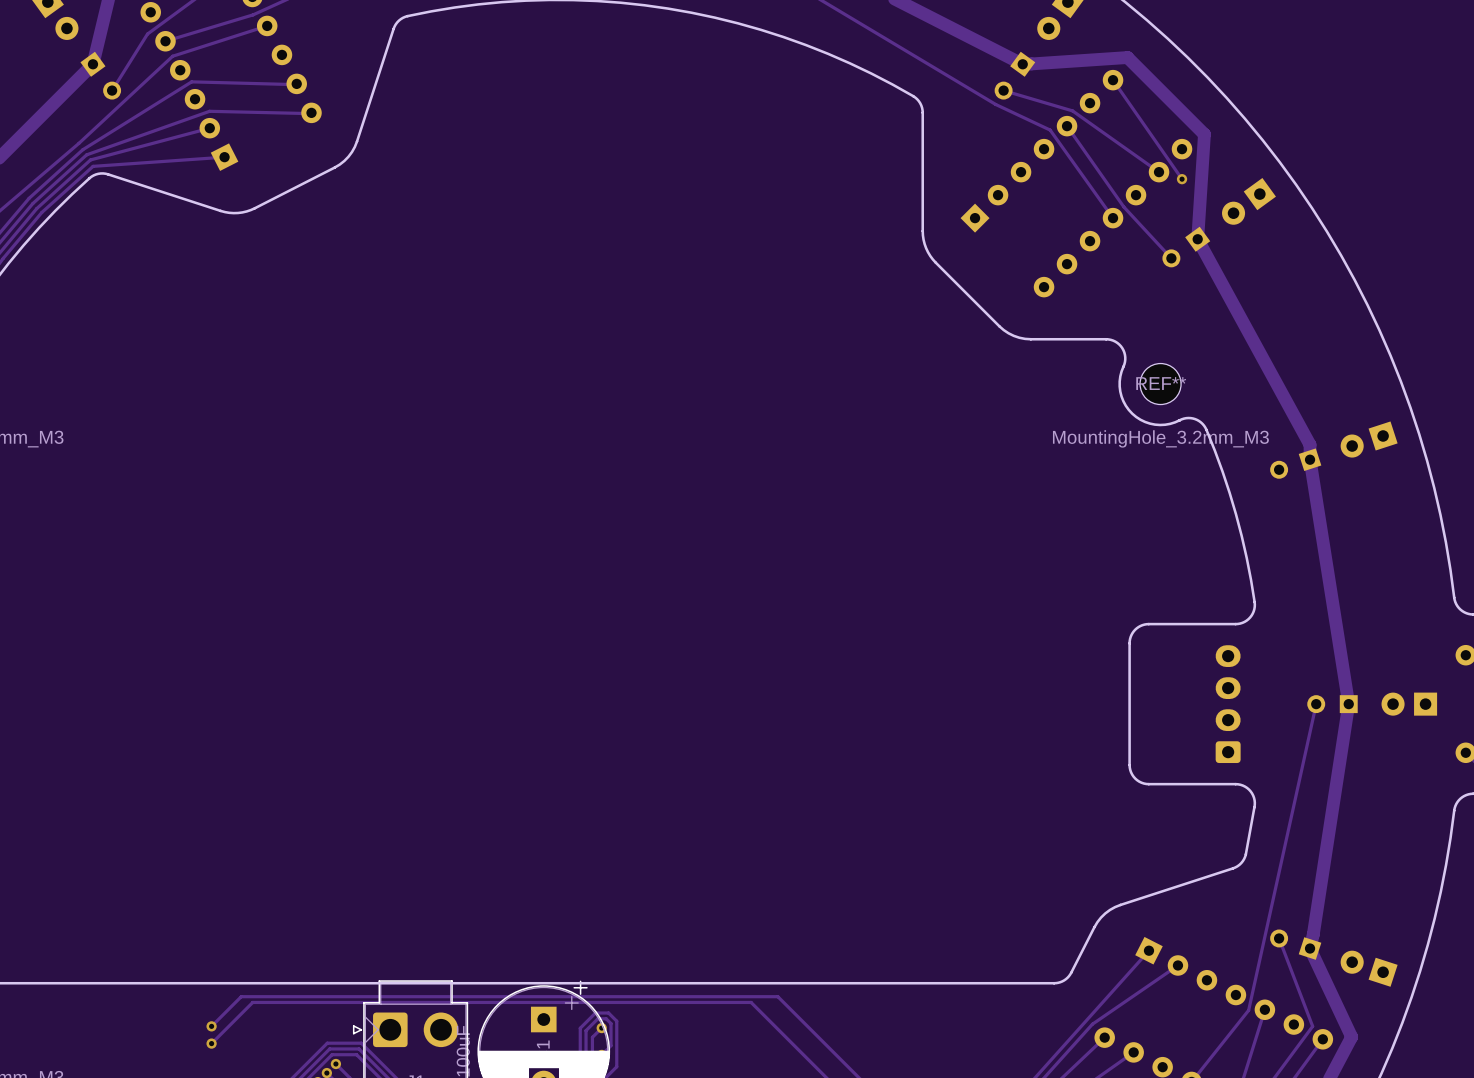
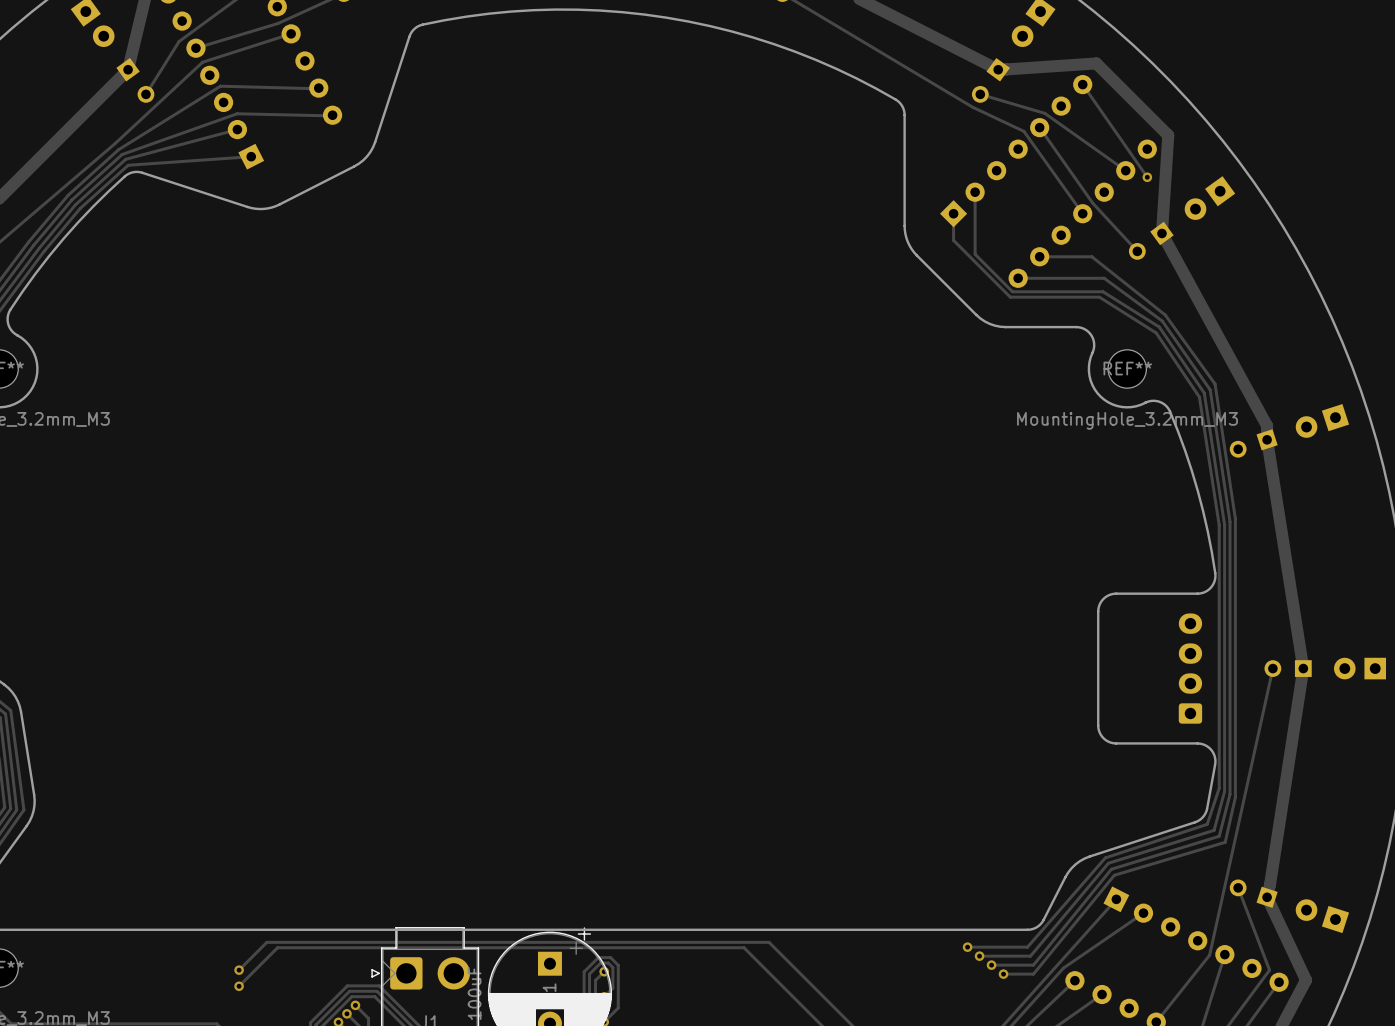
track: none -> (975, 192) (975, 254) (1012, 291) (1103, 291) (1159, 327) (1204, 392) (1224, 524) (1224, 791) (1214, 830) (1108, 863) (1030, 956) (979, 956)
track: none -> (953, 213) (953, 240) (1010, 297) (1099, 297) (1156, 333) (1199, 397) (1219, 525) (1219, 788) (1207, 824) (1105, 857) (1027, 947) (967, 947)
track: none -> (1039, 256) (1091, 256) (1165, 315) (1215, 383) (1235, 518) (1235, 797) (1225, 842) (1114, 875) (1033, 974) (1003, 974)
track: none -> (1018, 278) (1104, 278) (1162, 321) (1210, 389) (1230, 521) (1230, 794) (1219, 836) (1111, 869) (1033, 965) (991, 965)
via: none -> (967, 947)
via: none -> (979, 956)
via: none -> (991, 965)
via: none -> (1003, 974)

